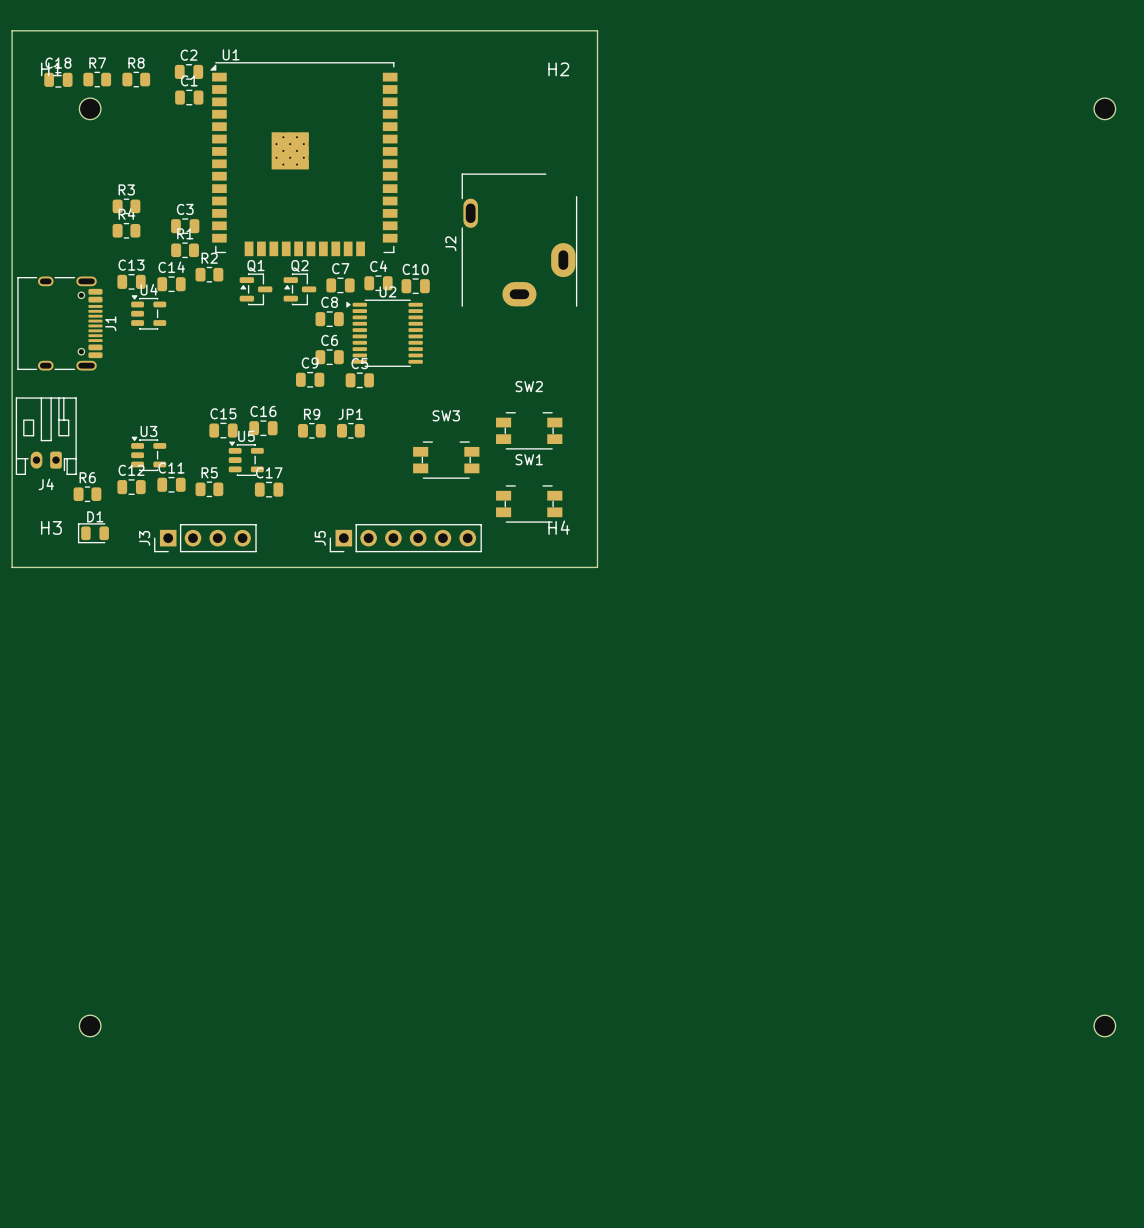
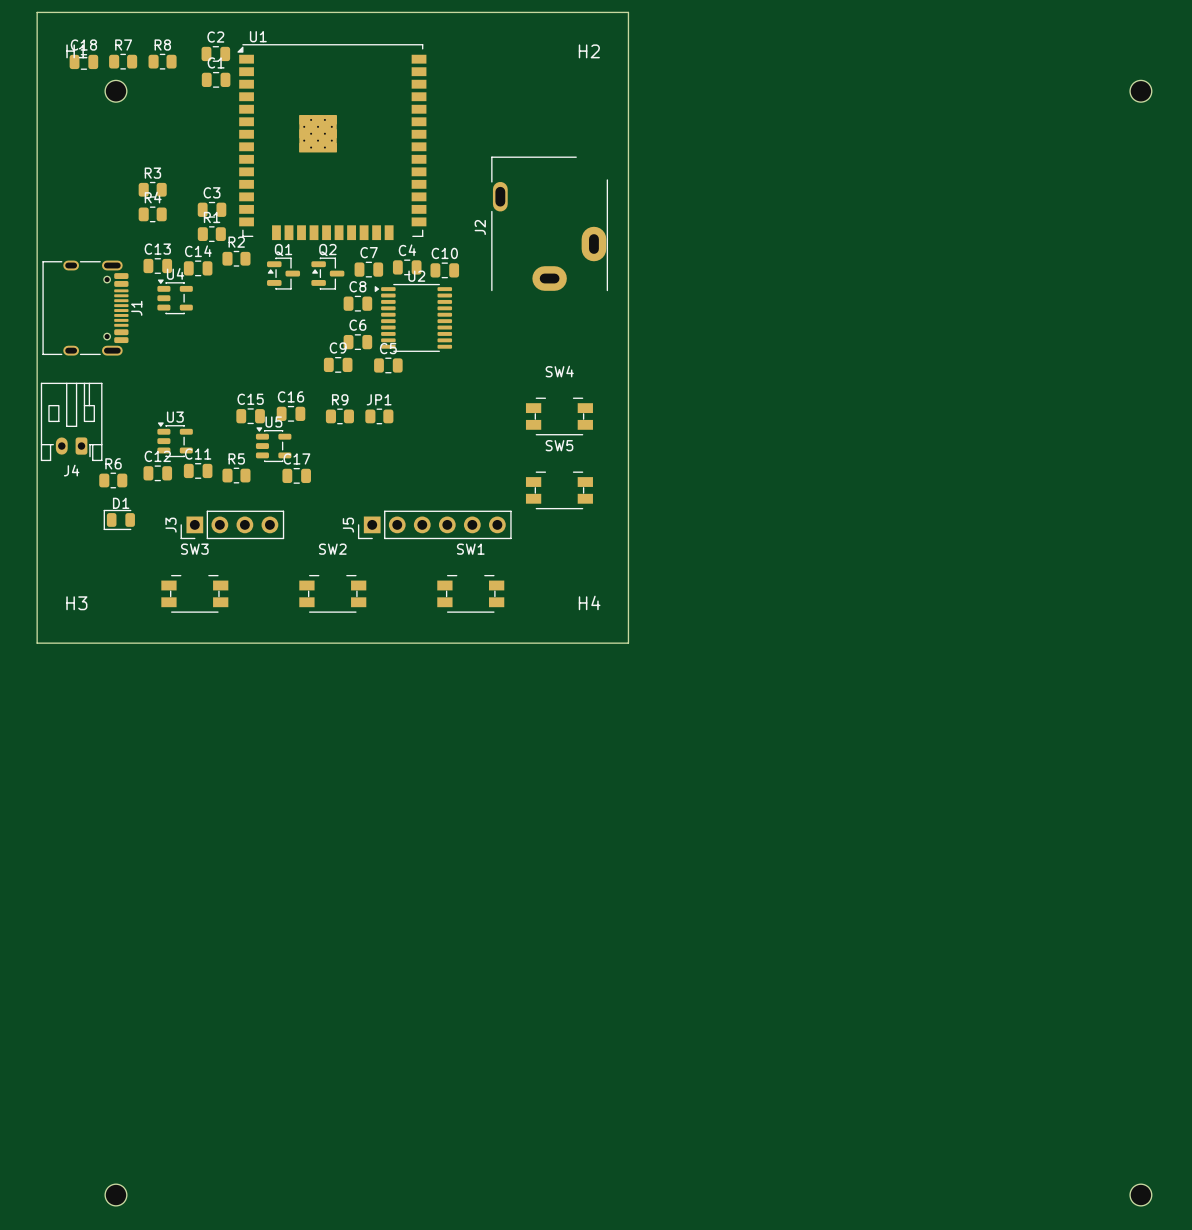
SW2 name: SW2 (529, 386) -> SW4 (559, 371)
SW1 name: SW1 (529, 459) -> SW5 (559, 445)
SW3 position: (446, 460) -> (194, 593)
H3 name position: H3 (51, 527) -> H3 (76, 603)
H4 name position: H4 (559, 527) -> H4 (589, 602)
board edge: (12, 567) (597, 567) -> (37, 554) (37, 643) (628, 643) (628, 554)
SW2: none -> (332, 593)
SW1: none -> (470, 593)
H3 position: (90, 1025) -> (115, 1195)
H4 position: (1104, 1025) -> (1140, 1195)

